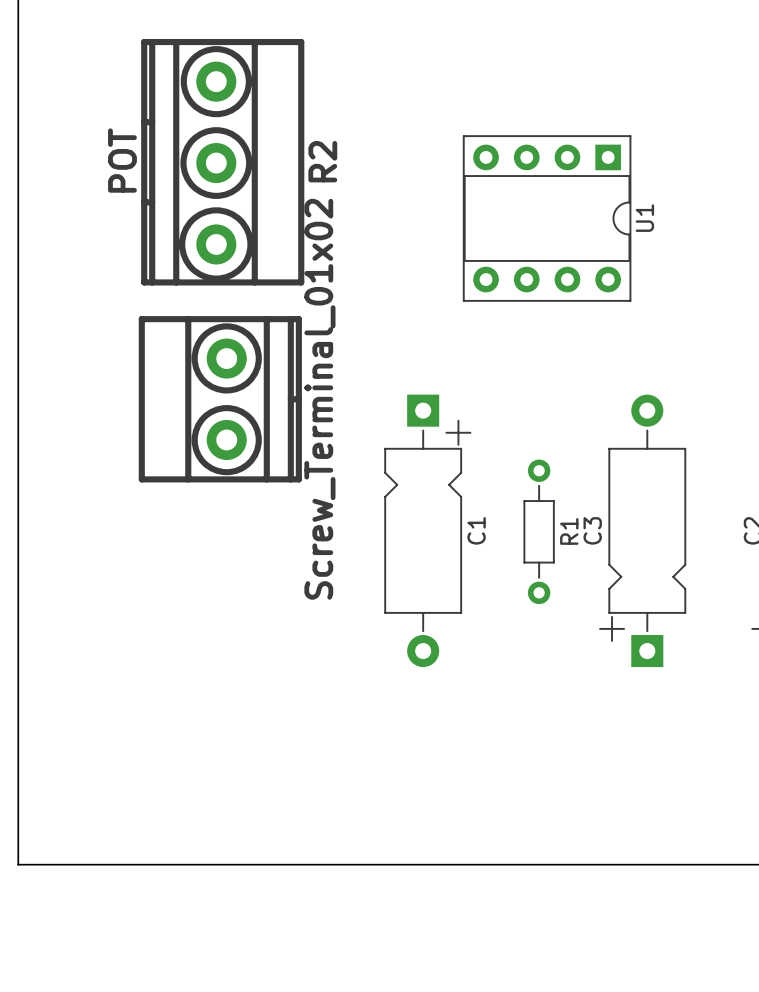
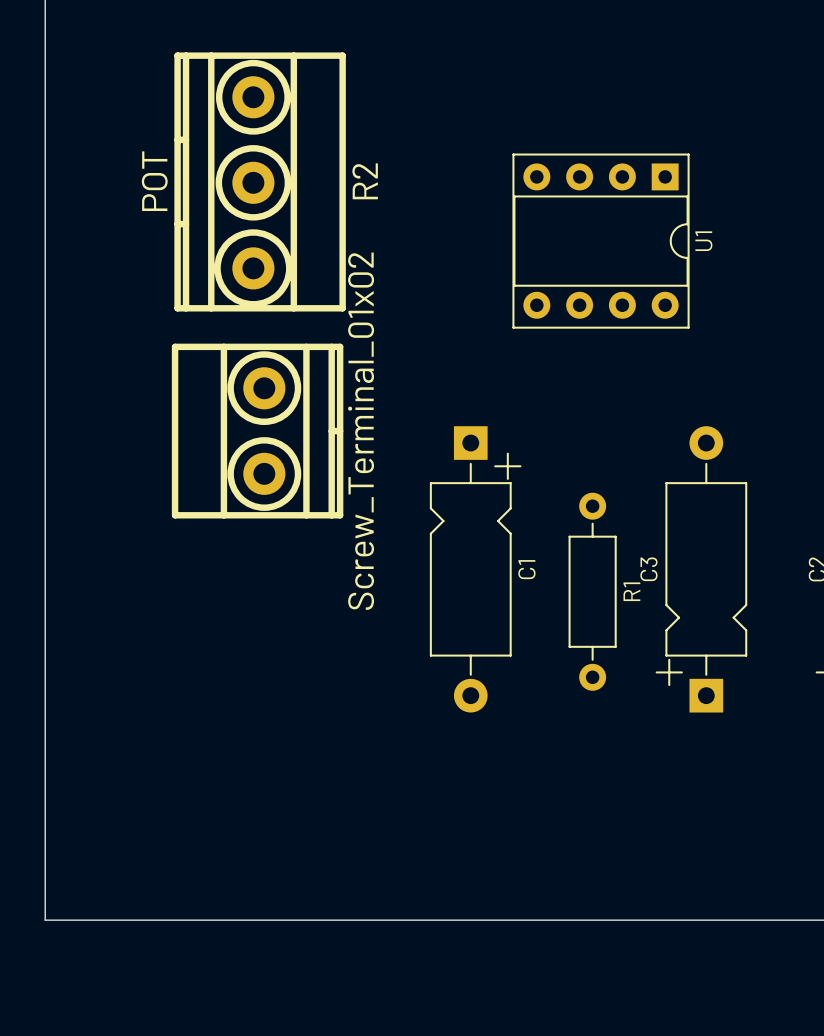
R1 footprint: [523, 459, 555, 605] -> [568, 492, 617, 691]

